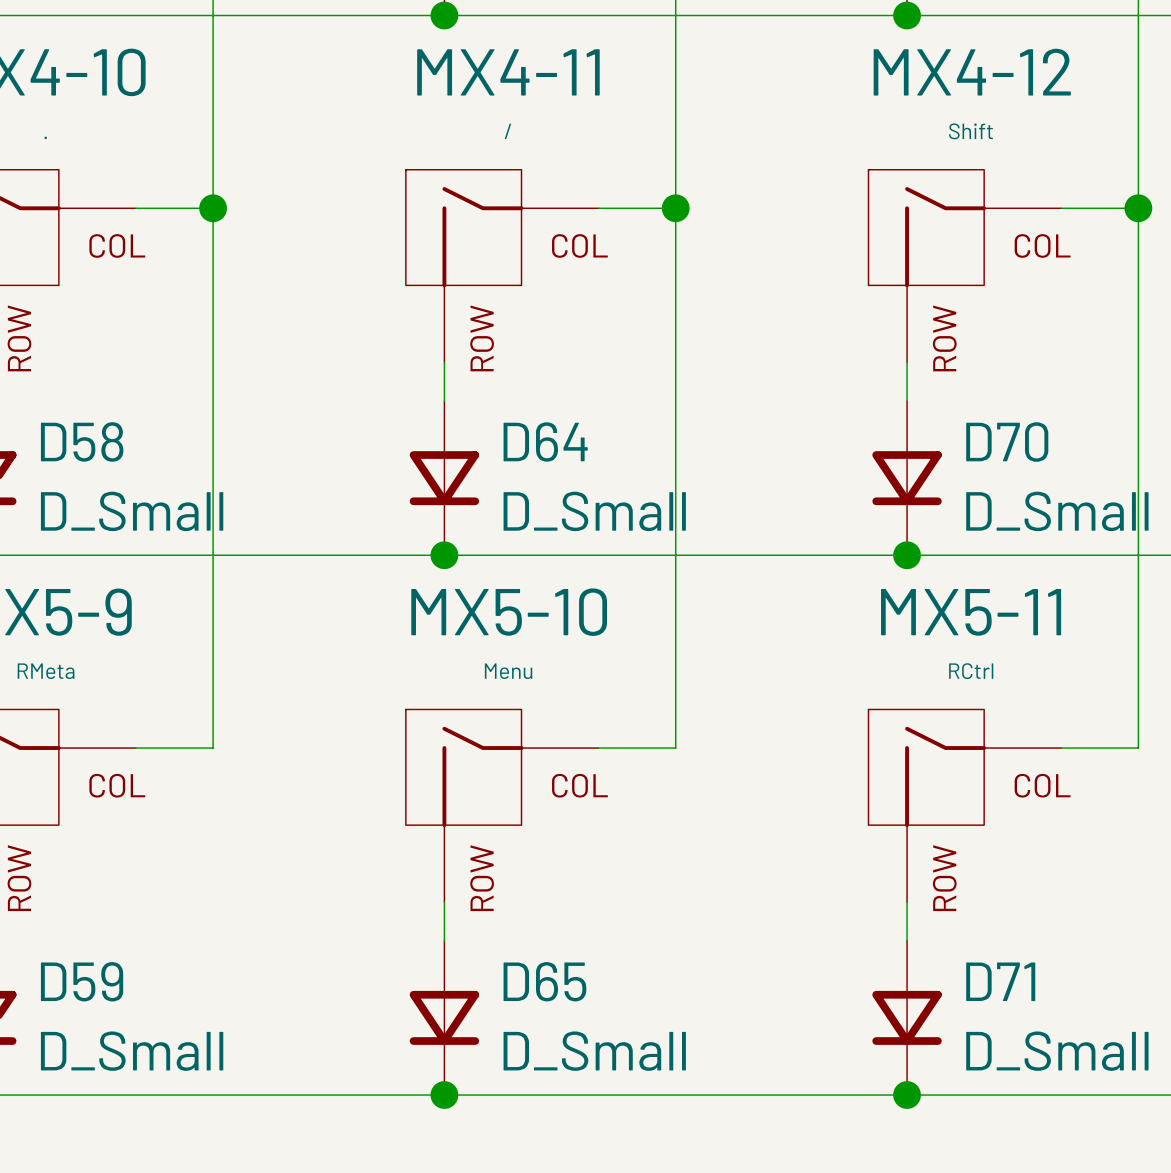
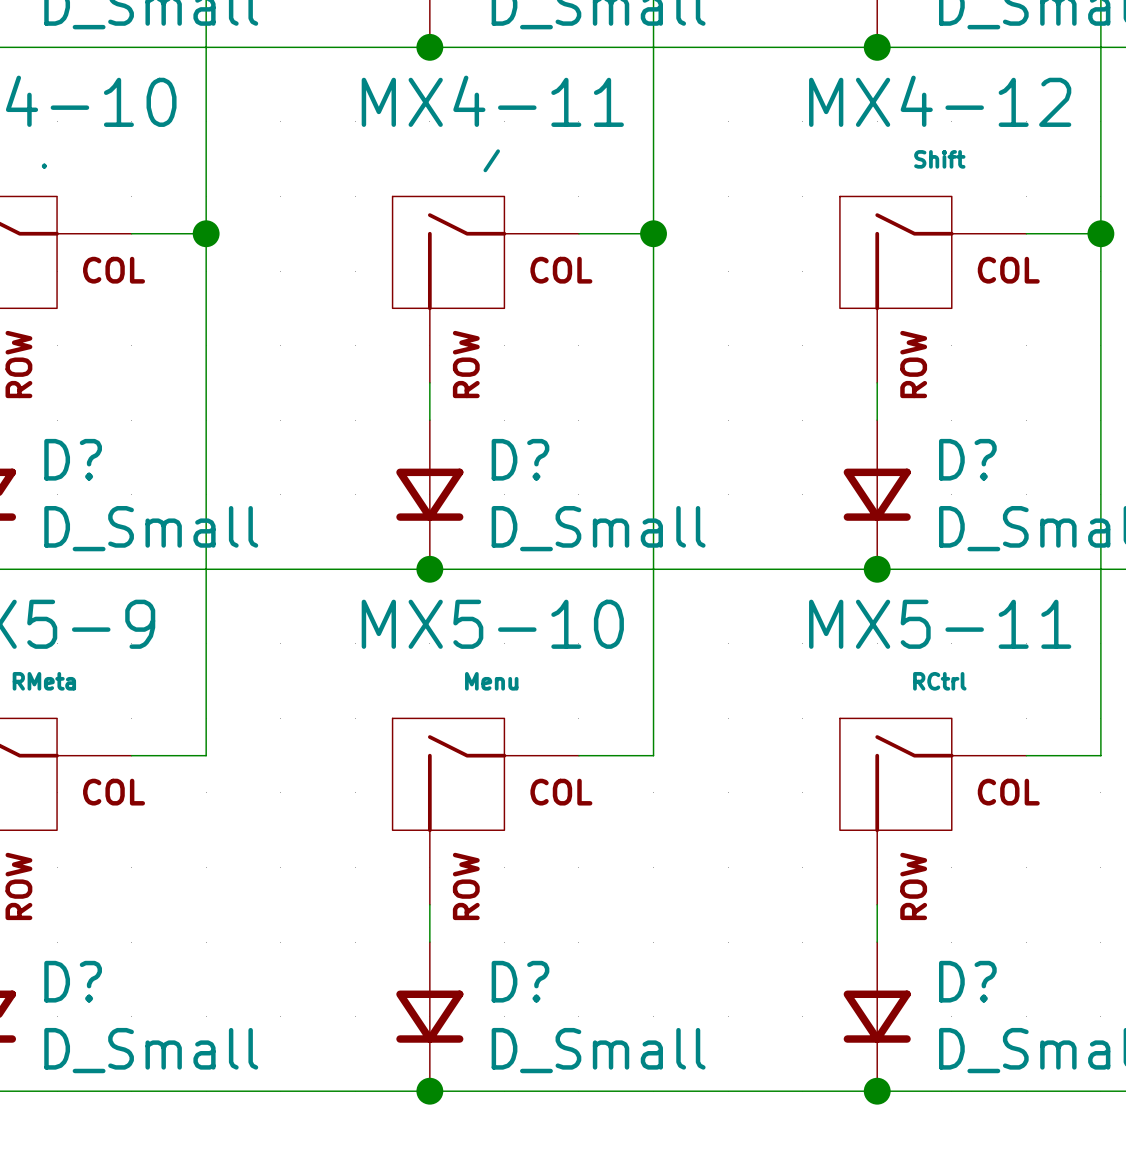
D58 name: D58 (82, 441) -> D? (73, 459)
D64 name: D64 (545, 441) -> D? (520, 459)
D70 name: D70 (1007, 442) -> D? (967, 459)
D59 name: D59 (82, 981) -> D? (73, 981)
D65 name: D65 (544, 981) -> D? (520, 981)
D71 name: D71 (1000, 981) -> D? (967, 981)

